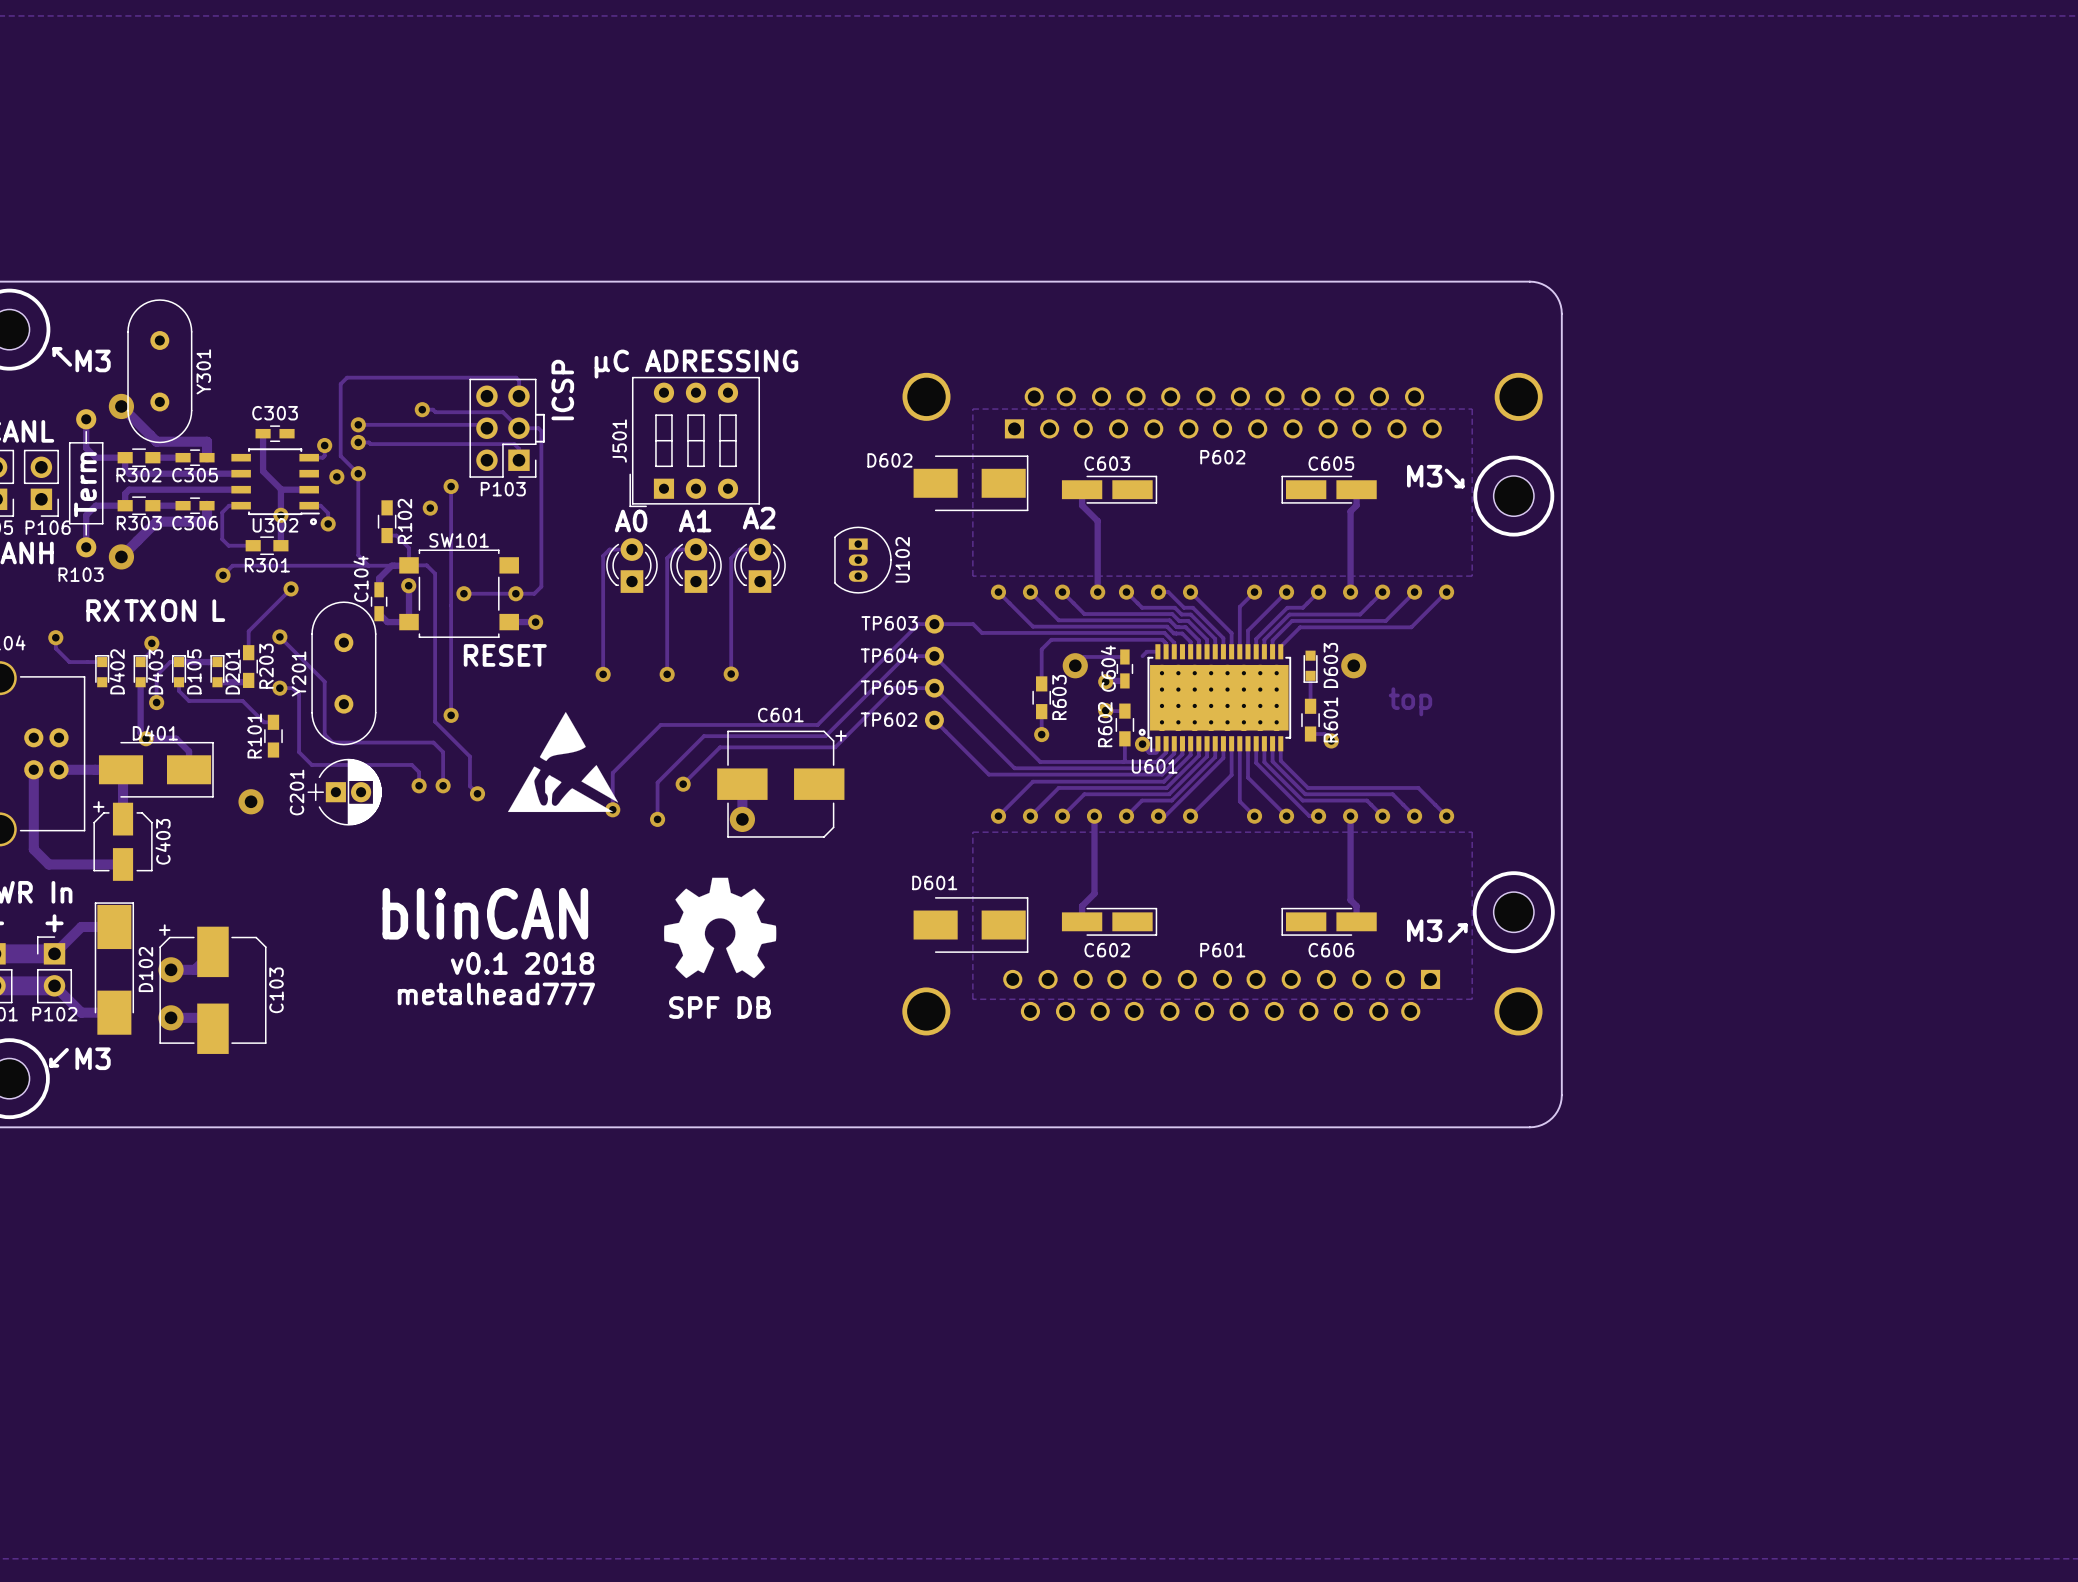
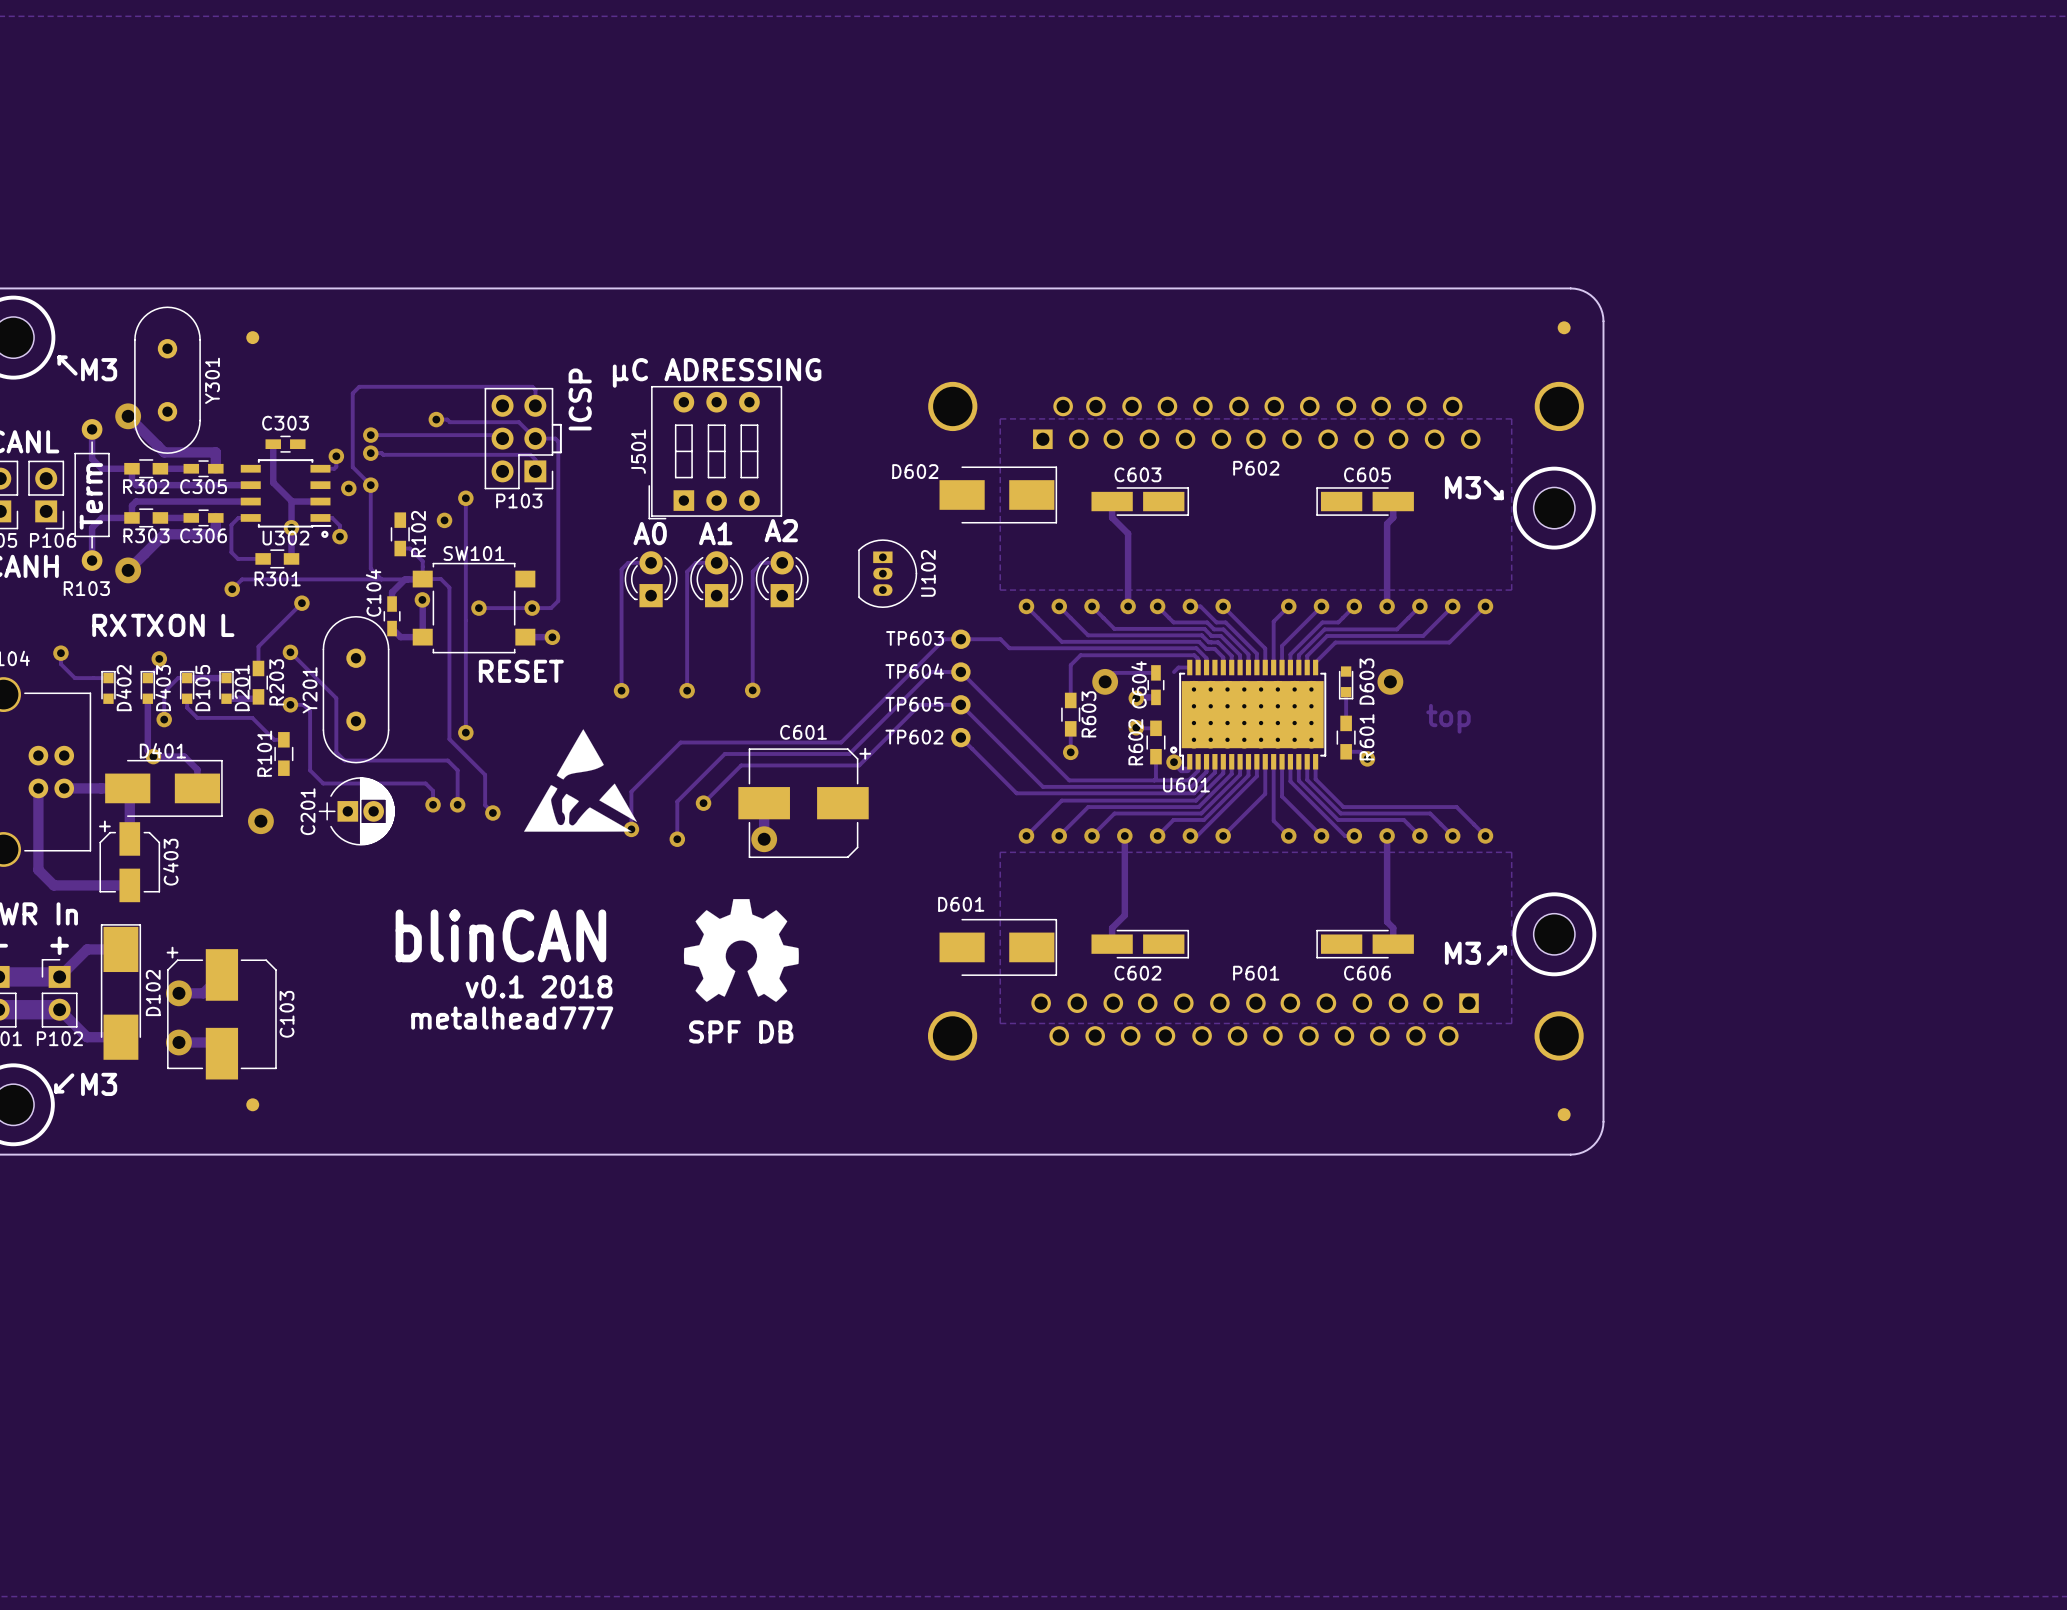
part: none -> (1564, 327)
part: none -> (252, 337)
part: none -> (252, 1104)
part: none -> (1564, 1114)

